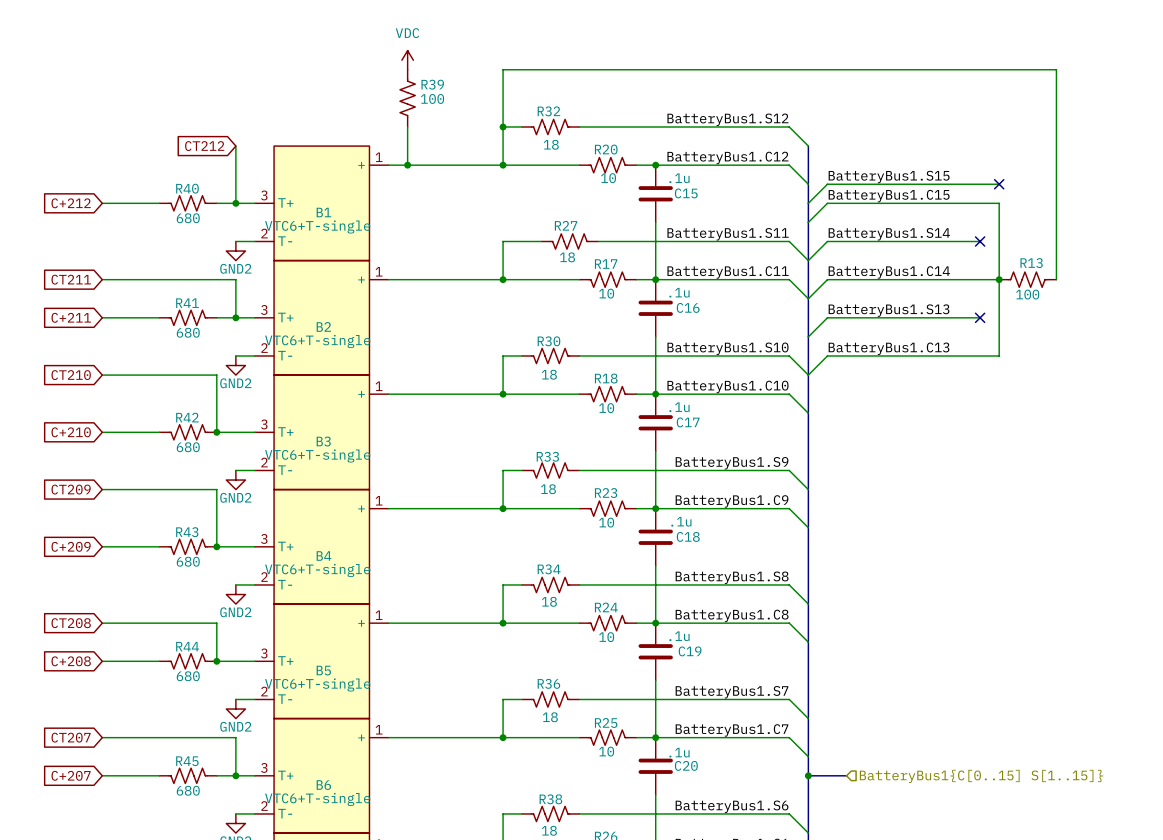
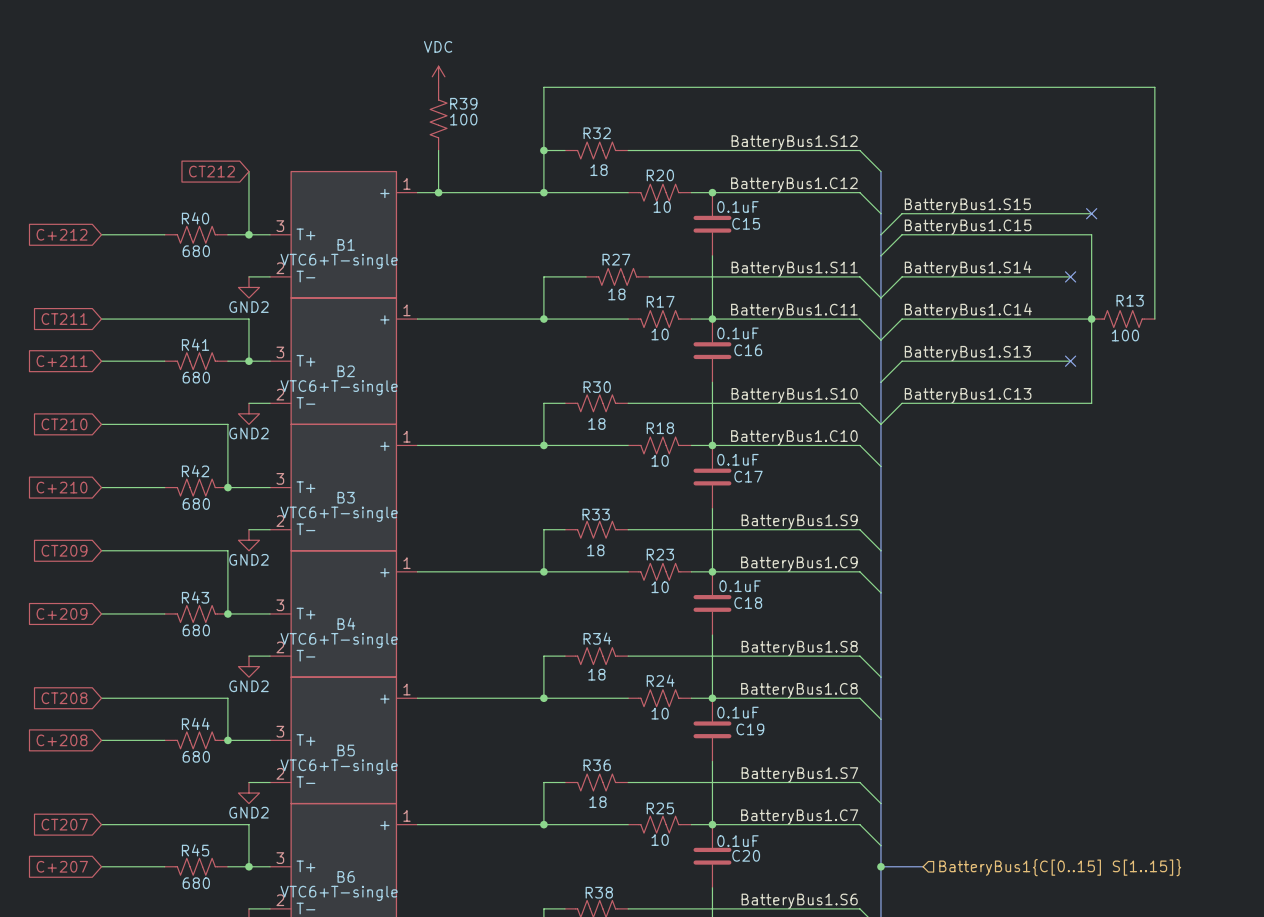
C15 value: .1u (679, 178) -> 0.1uF (737, 207)
C16 value: .1u (679, 292) -> 0.1uF (737, 333)
C17 value: .1u (679, 407) -> 0.1uF (737, 459)
C18 value: .1u (681, 521) -> 0.1uF (740, 586)
C19 value: .1u (679, 636) -> 0.1uF (737, 712)
C20 value: .1u (679, 752) -> 0.1uF (737, 841)

